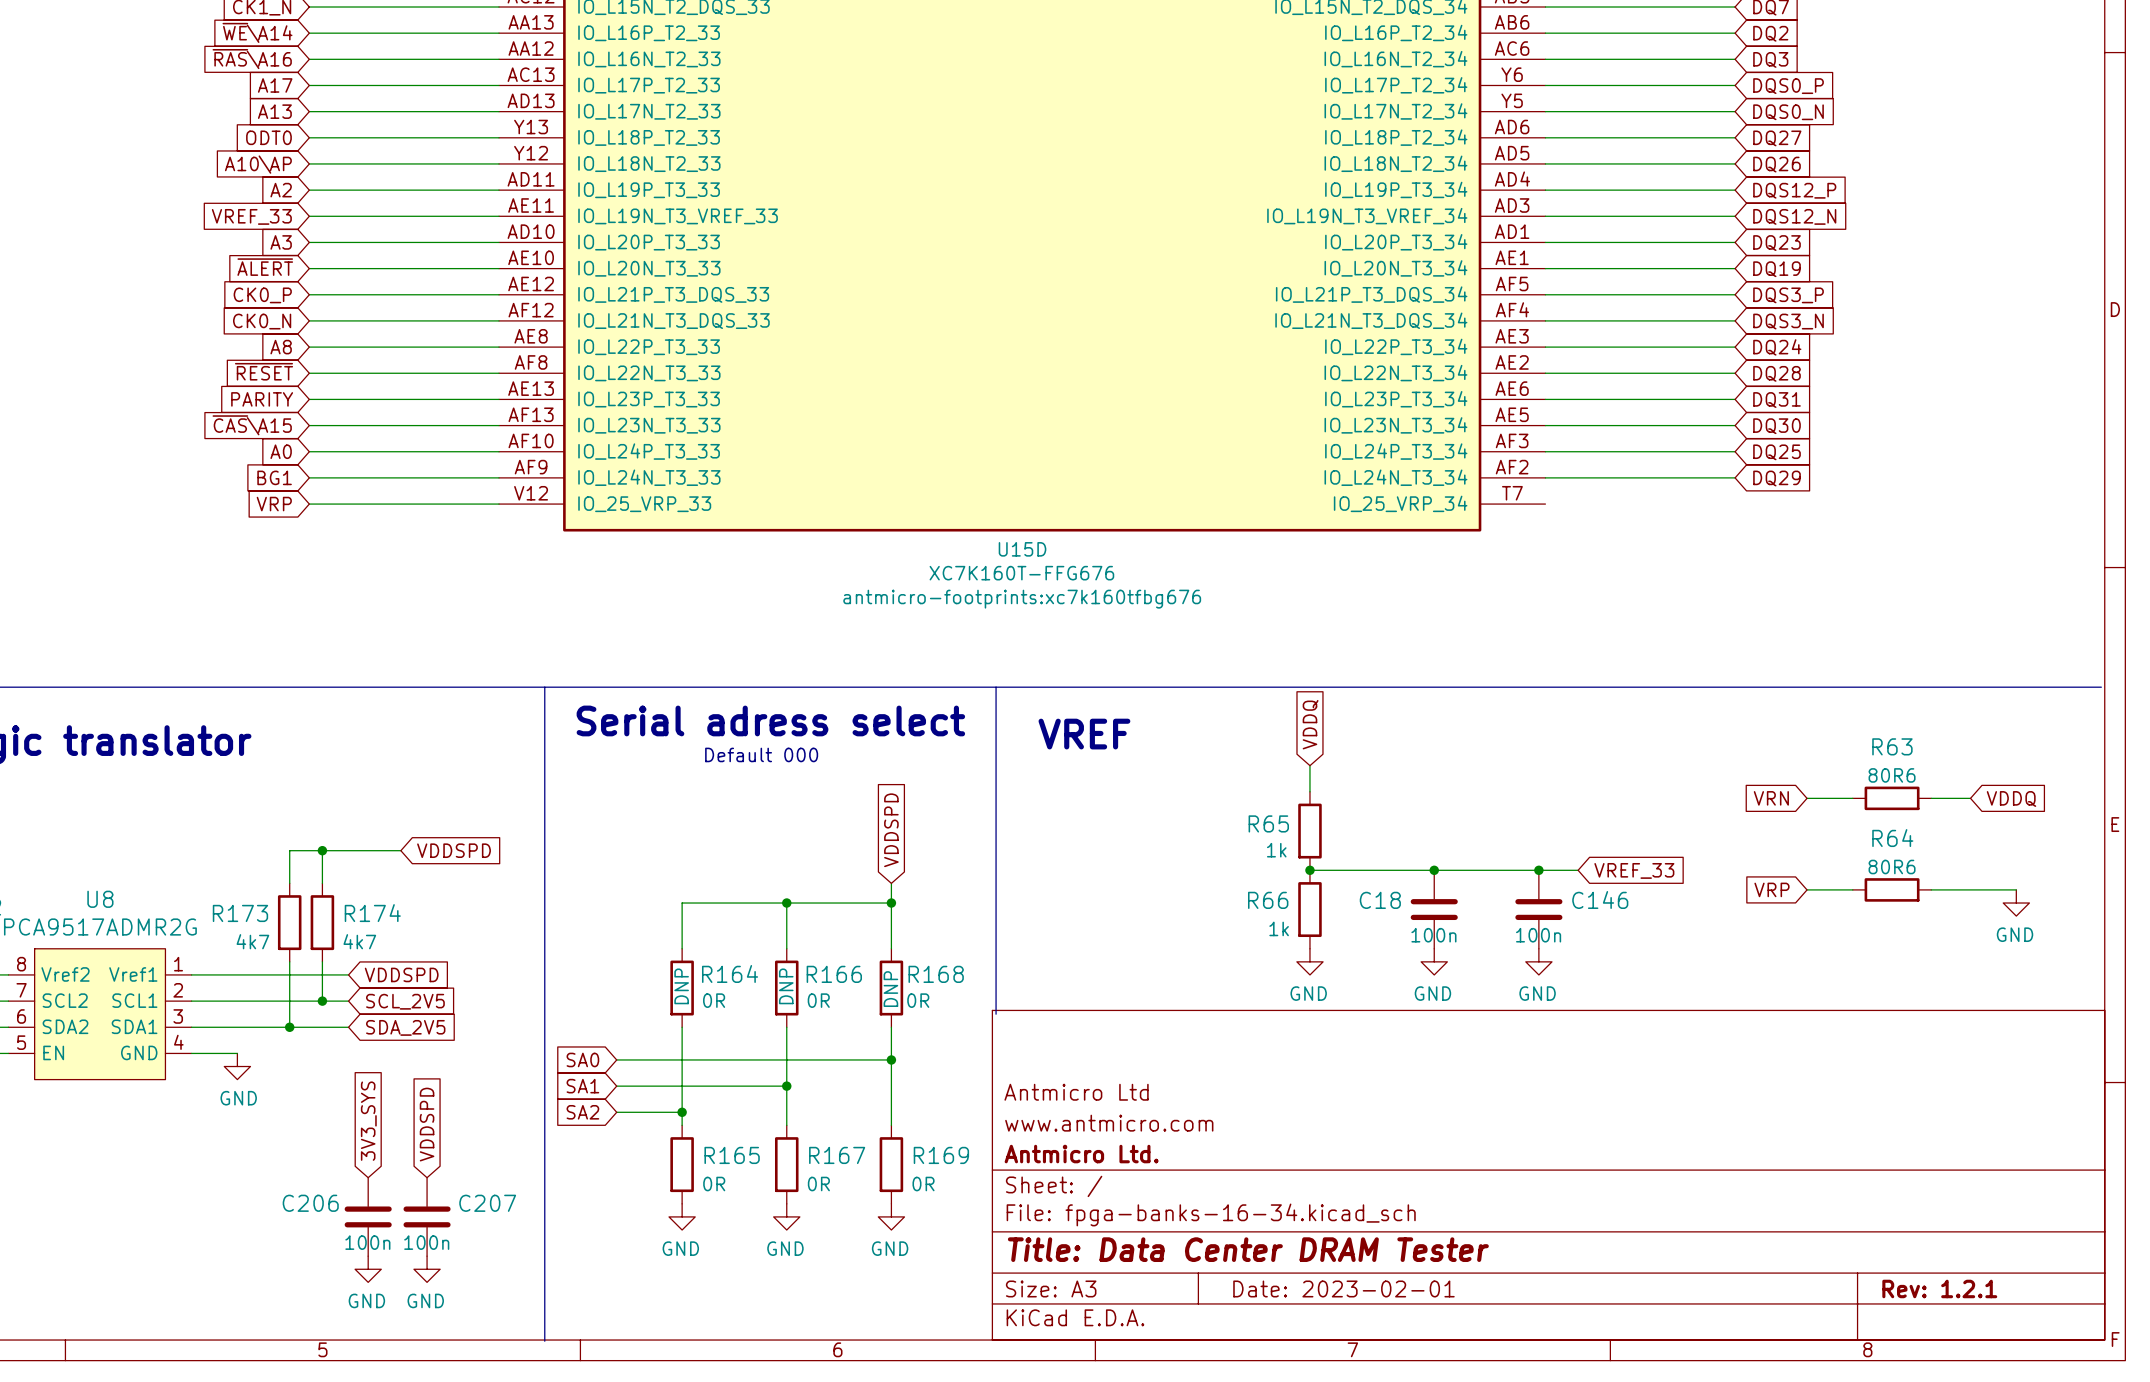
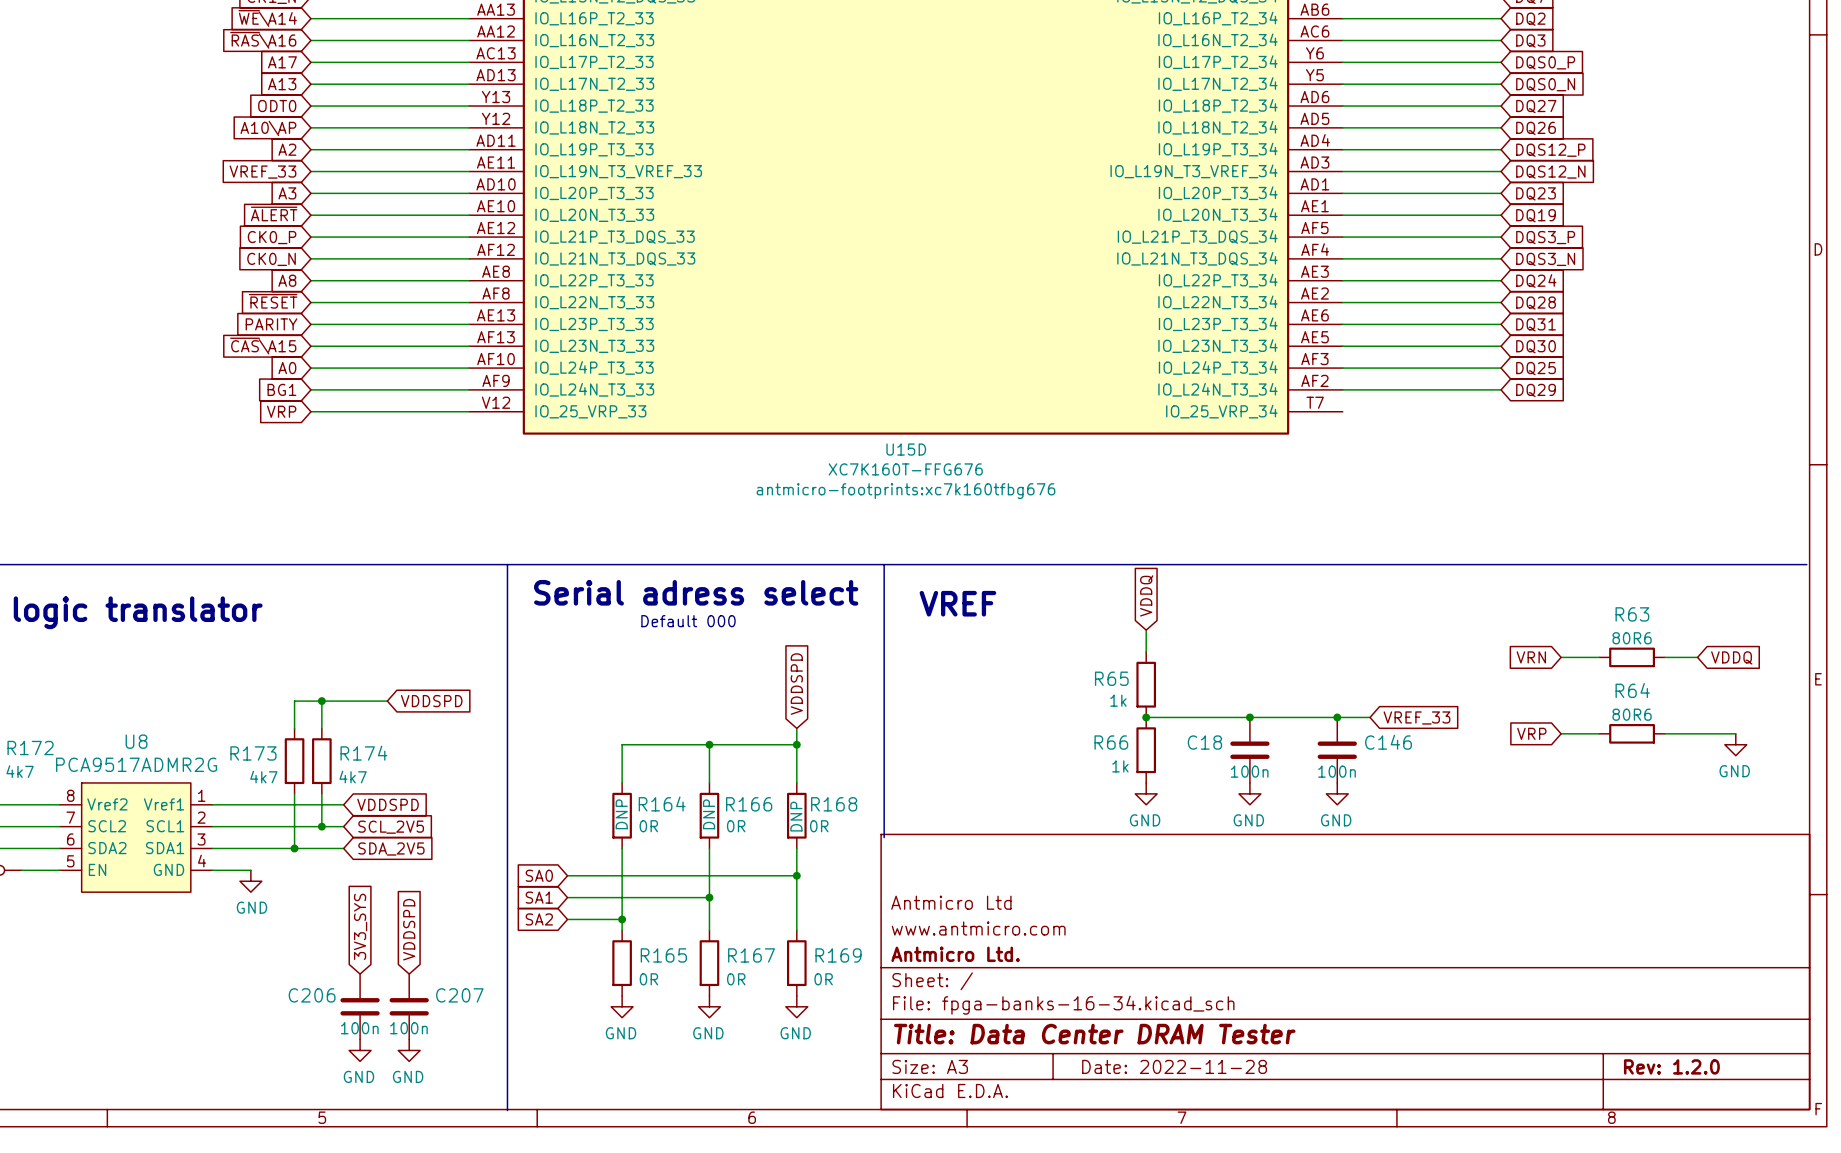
title block: Date: 2023-02-01 (1343, 1288) -> Date: 2022-11-28 (1174, 1066)
title block: Rev: 1.2.1 (1939, 1288) -> Rev: 1.2.0 (1671, 1066)

